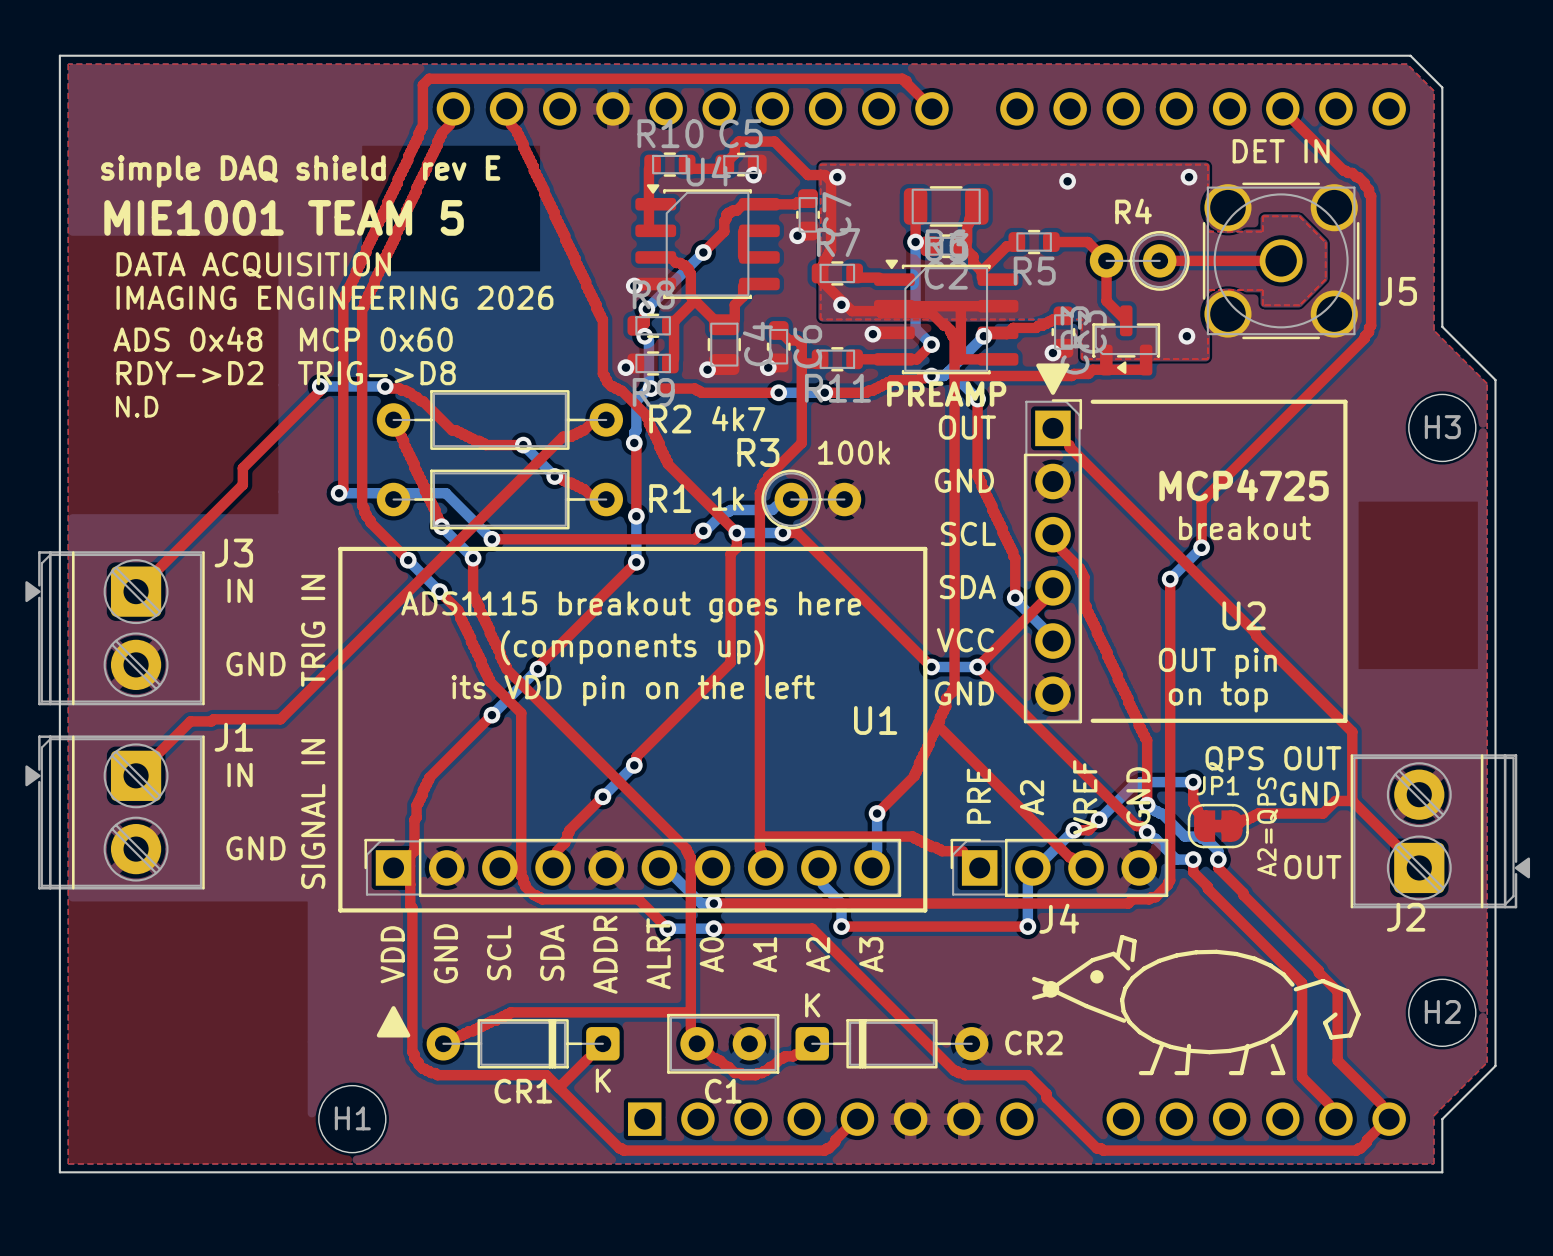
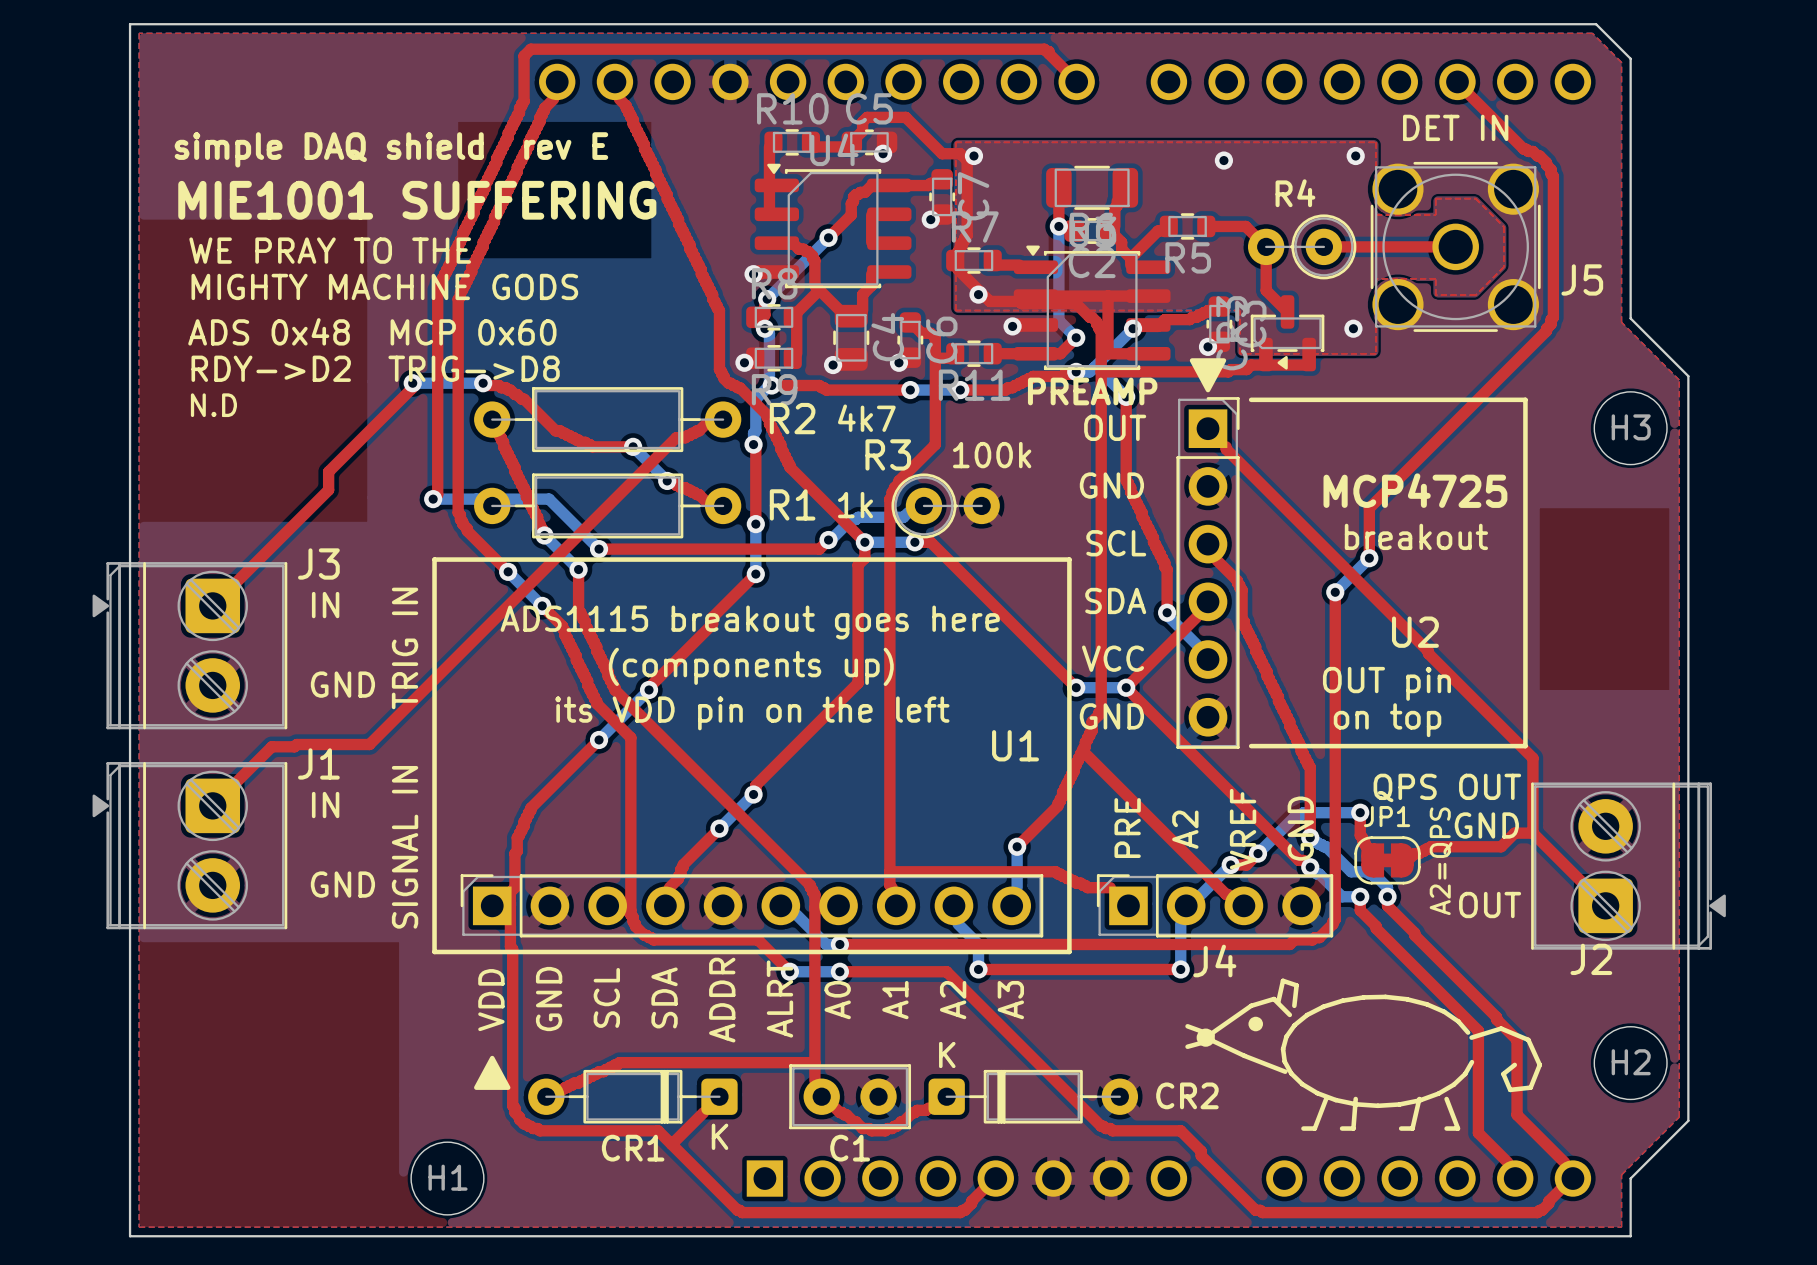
text: MIE1001 TEAM 5 (284, 217) -> MIE1001 SUFFERING (417, 200)
text: DATA ACQUISITION (253, 265) -> WE PRAY TO THE (330, 250)
text: IMAGING ENGINEERING 2026 (334, 297) -> MIGHTY MACHINE GODS (384, 286)

